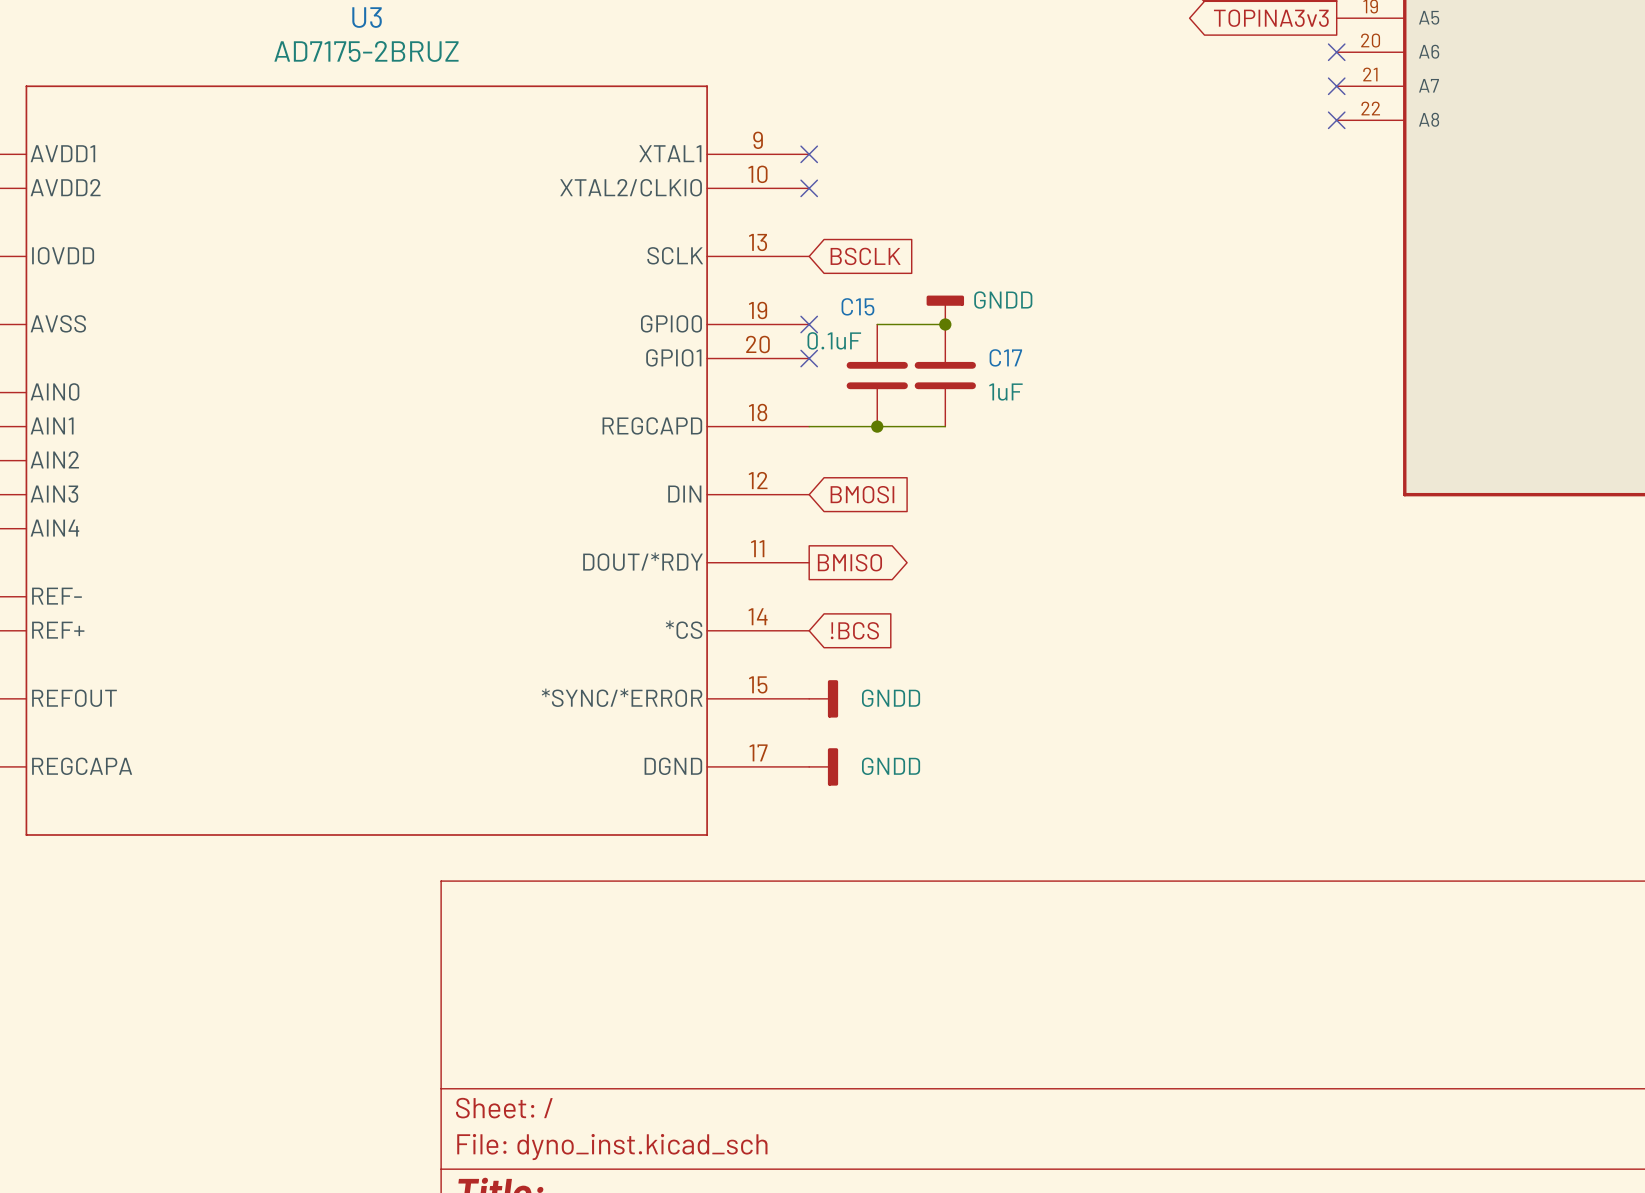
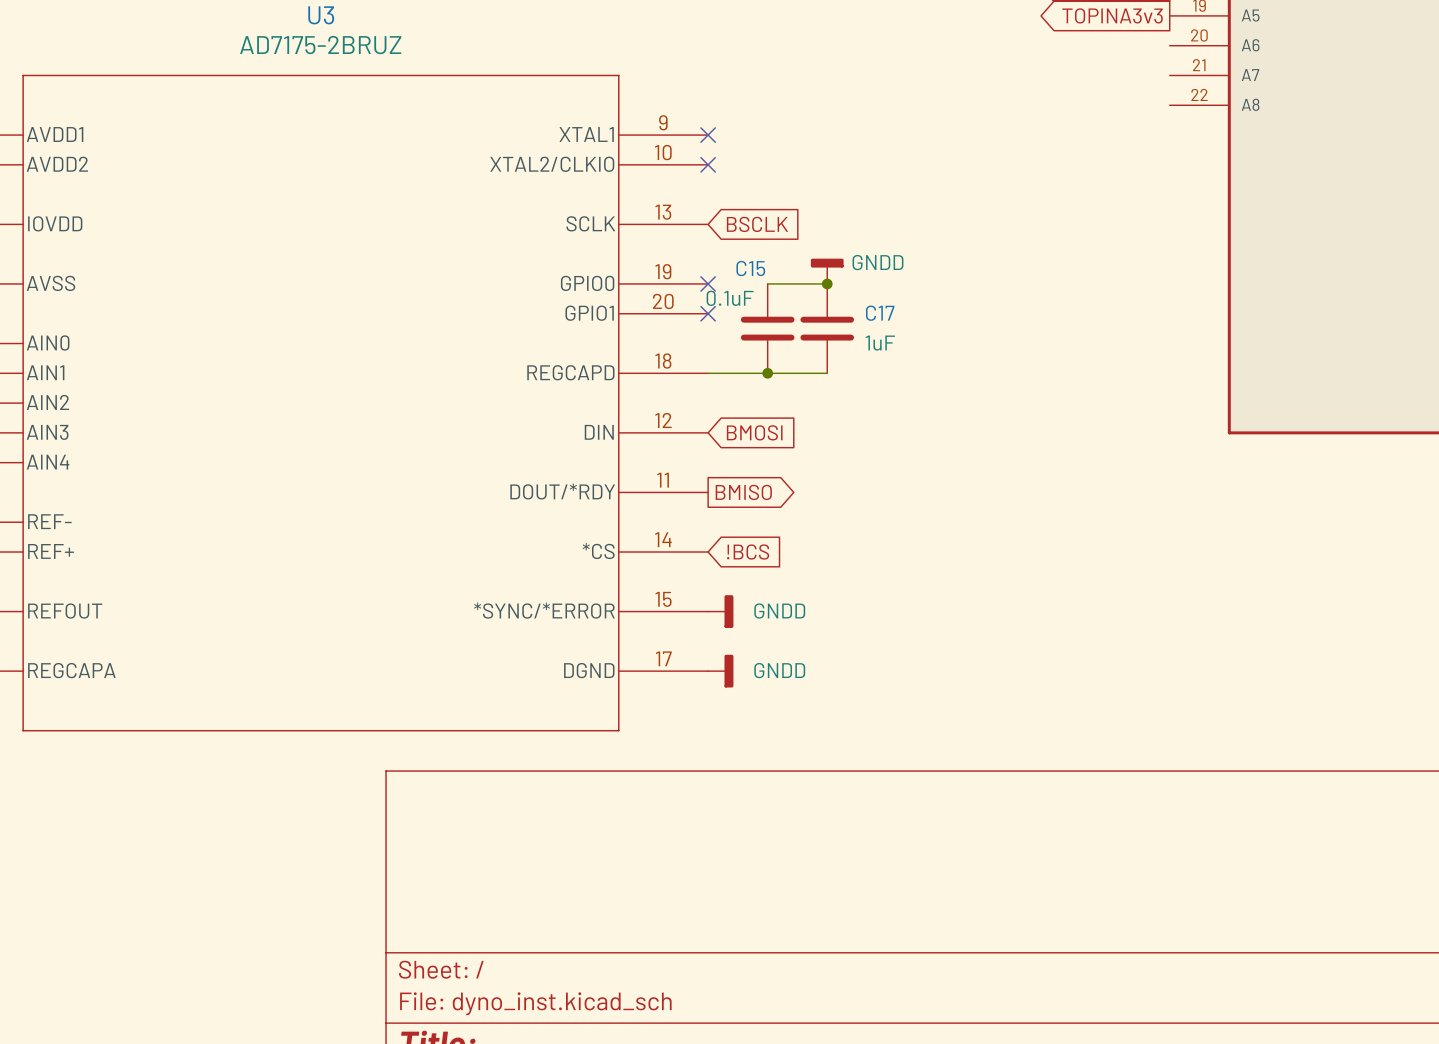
no-connect mark: (1336, 52) -> none
no-connect mark: (1336, 86) -> none
no-connect mark: (1336, 120) -> none

